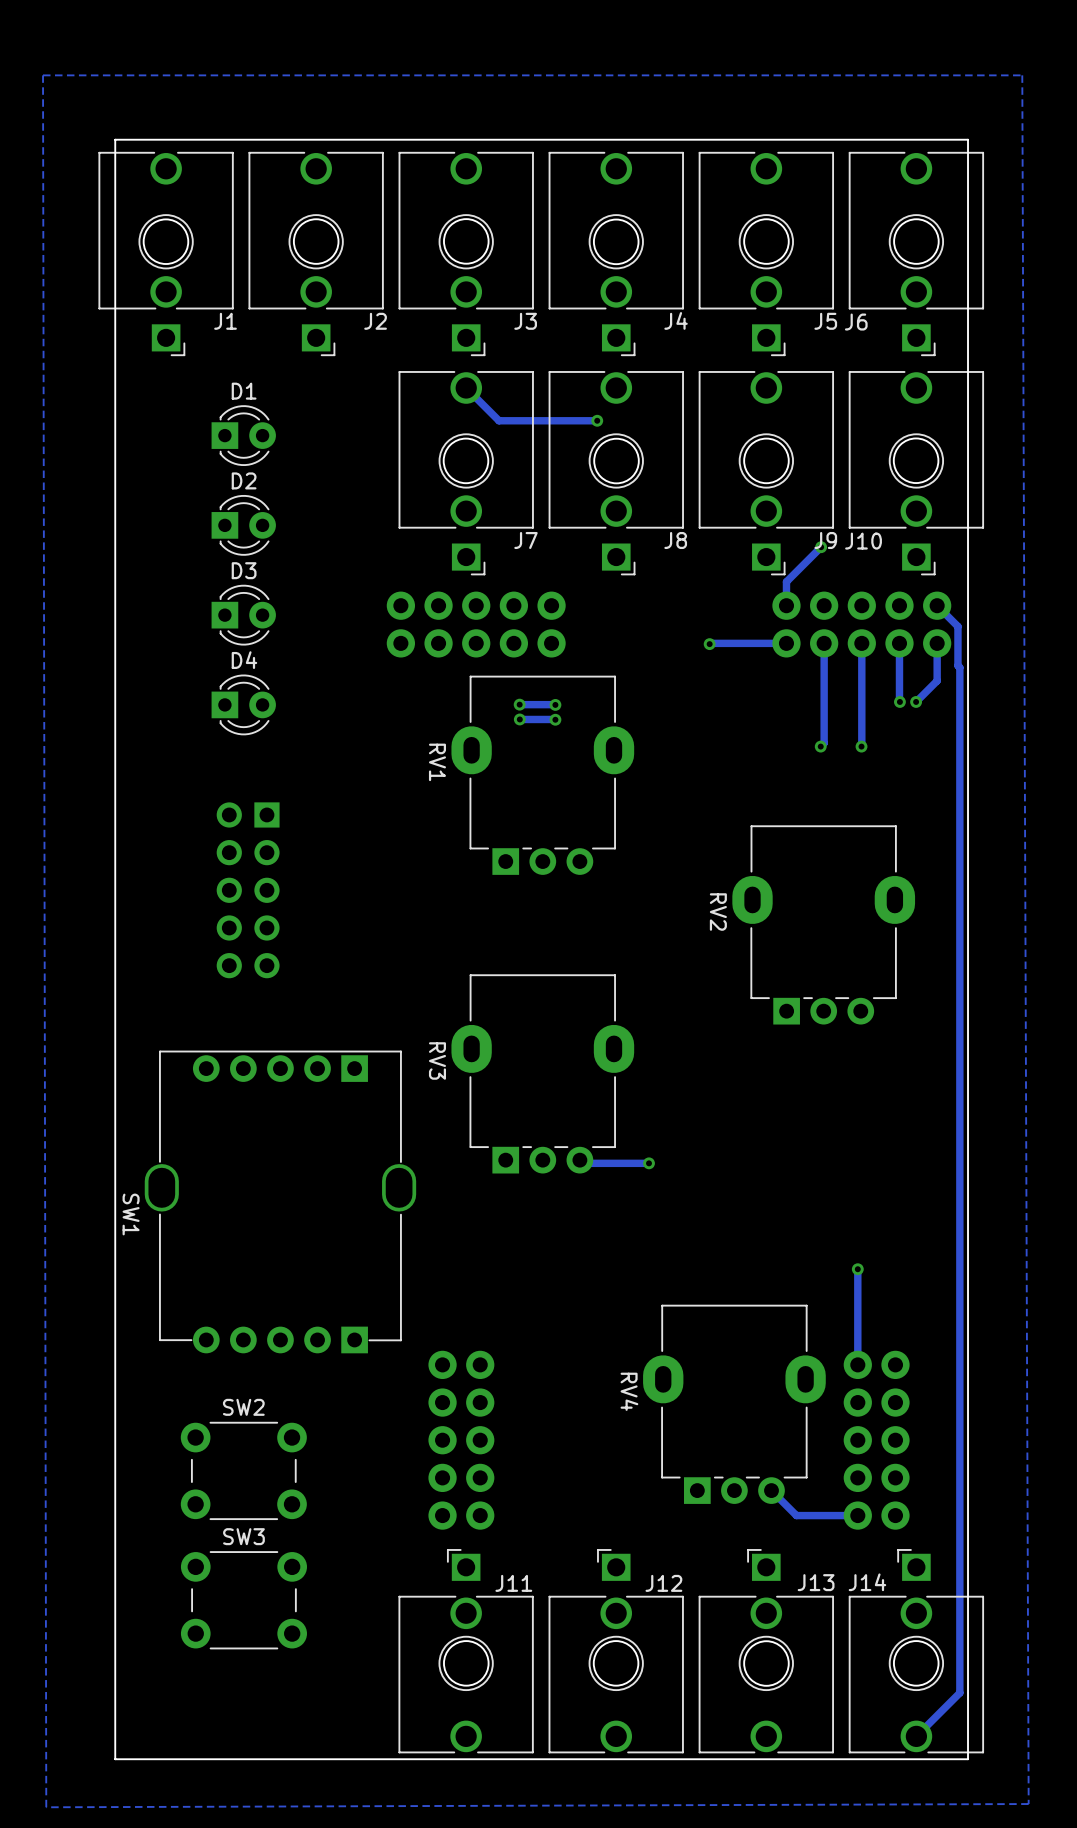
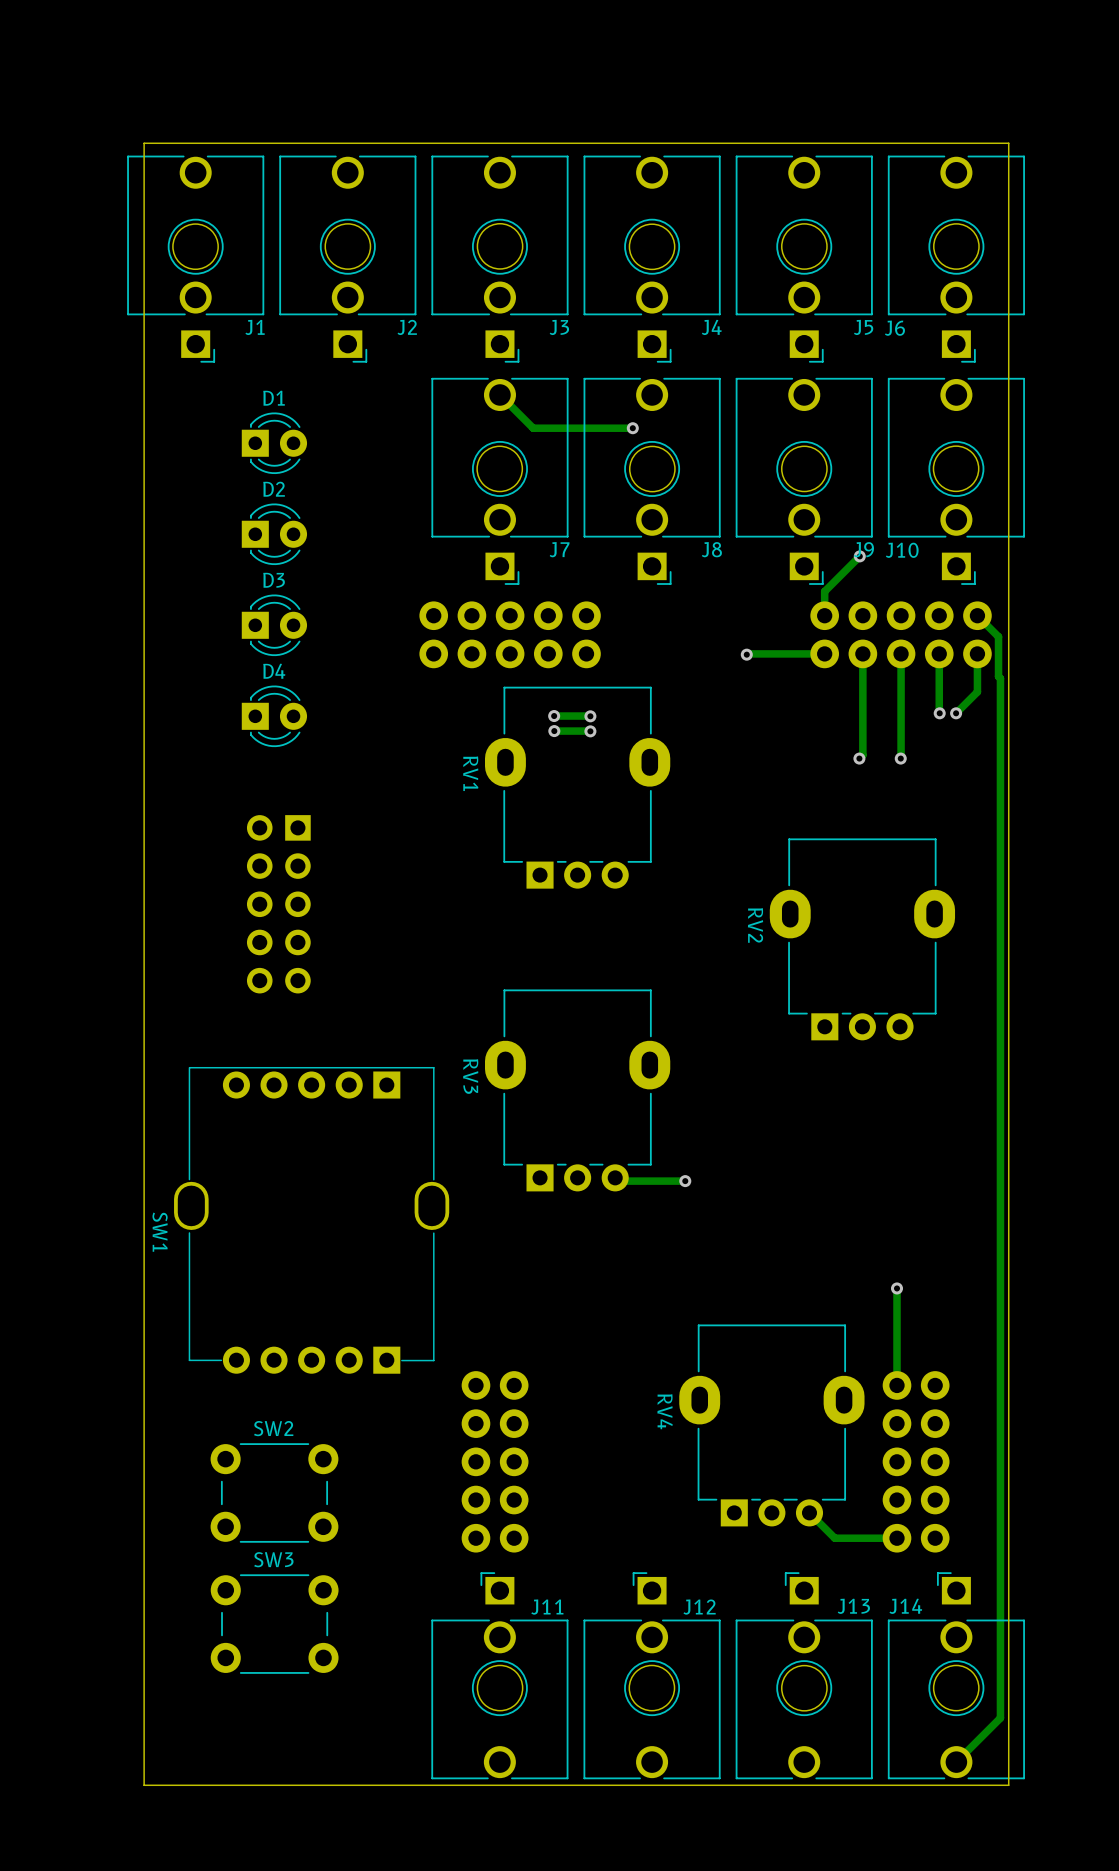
zone outline: (1022, 75) (43, 75) (46, 1807) (1028, 1804) (1022, 75) -> none

